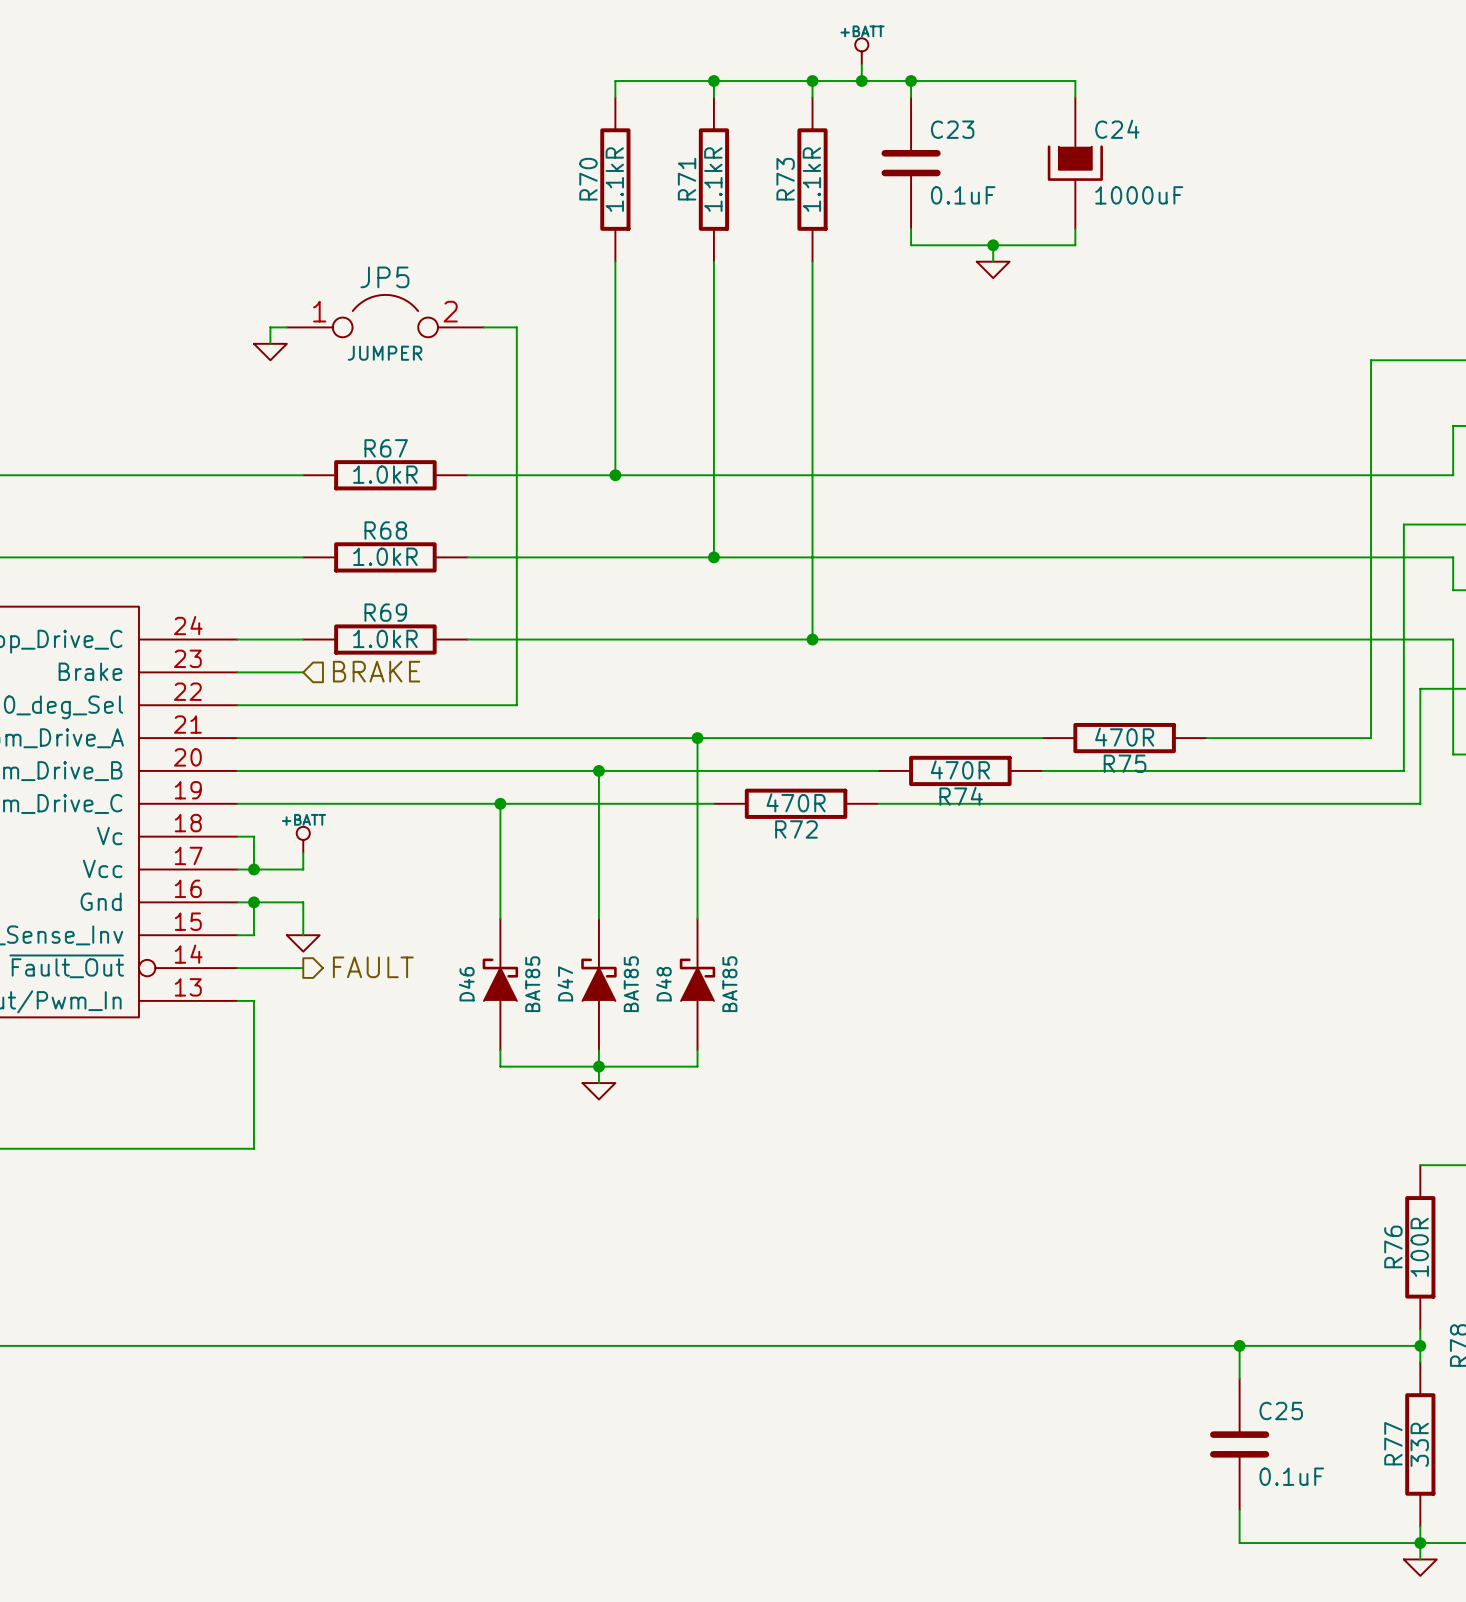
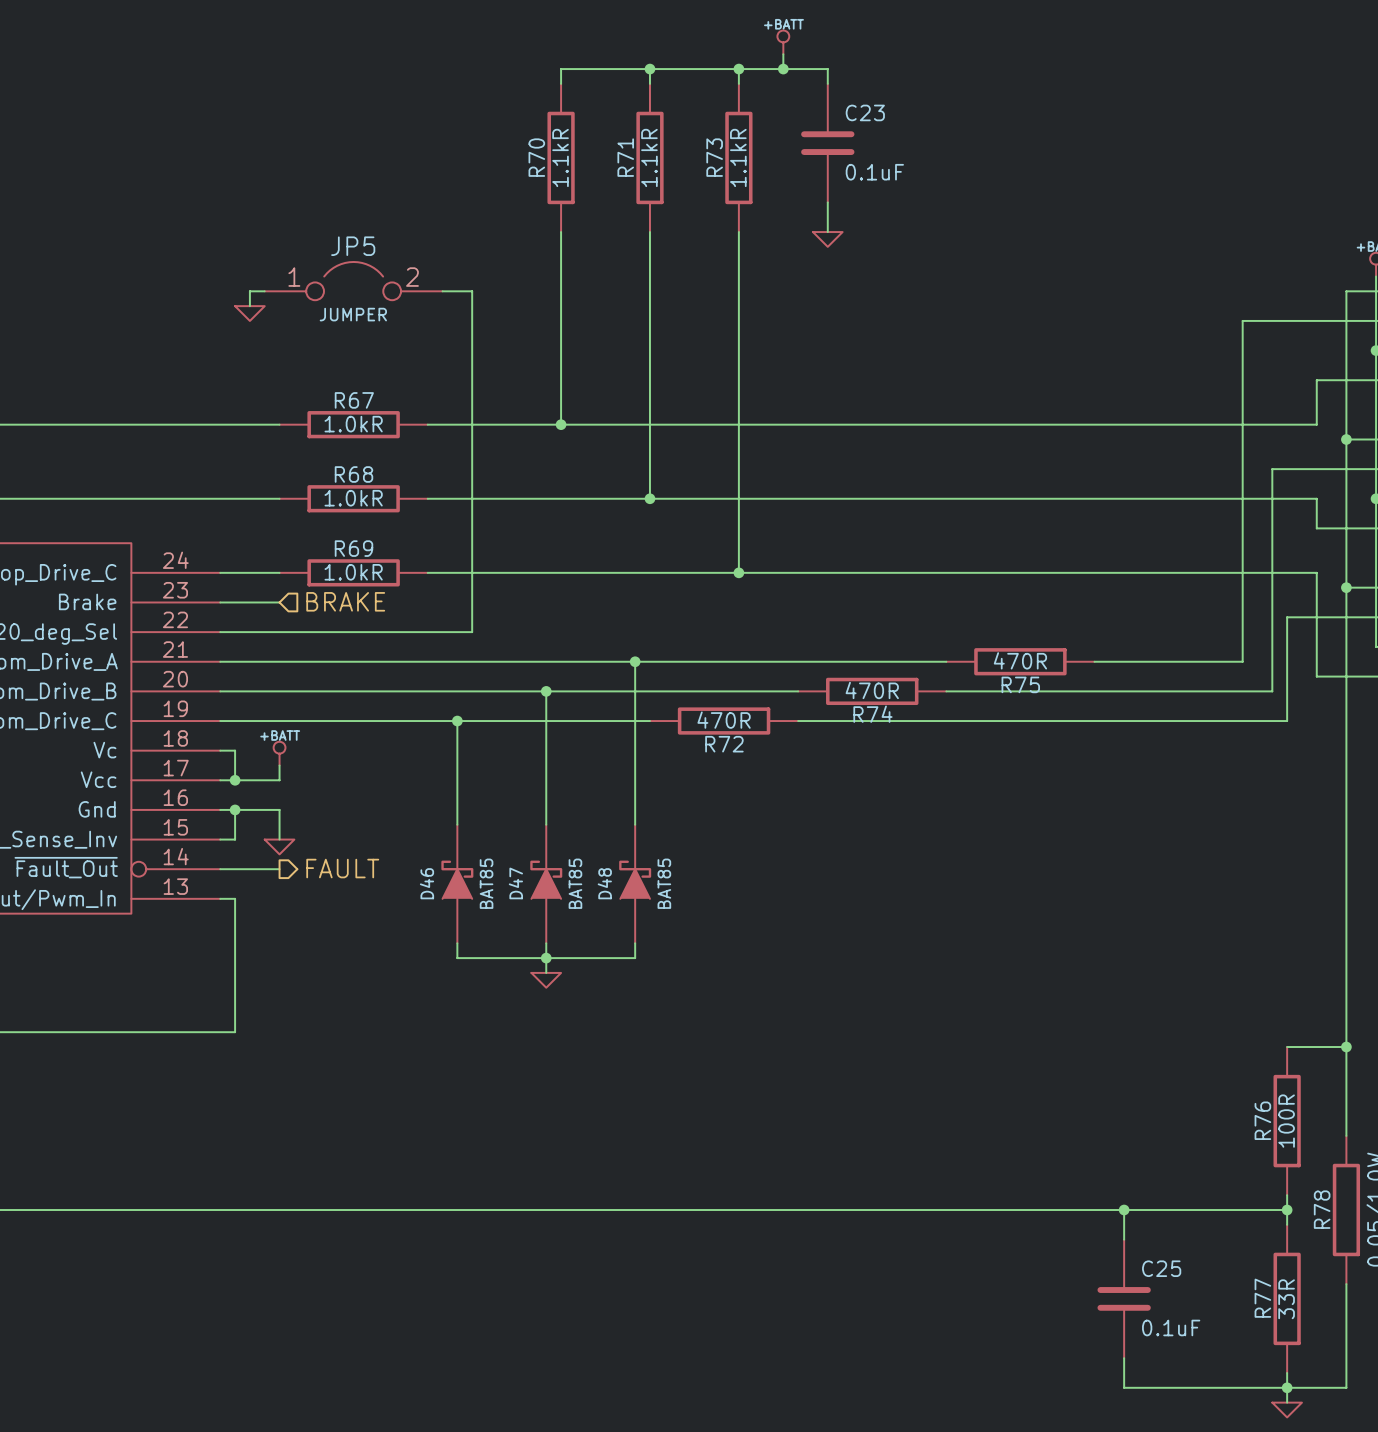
wire: (911, 81) (1075, 81) (1075, 97) -> none
junction: (911, 81) -> none
C24: 1000uF (1075, 163) -> none
wire: (1075, 228) (1075, 245) (911, 245) -> (827, 232) (827, 217)
wire: (993, 245) (993, 261) -> none
junction: (993, 245) -> none
power symbol position: (993, 269) -> (827, 239)

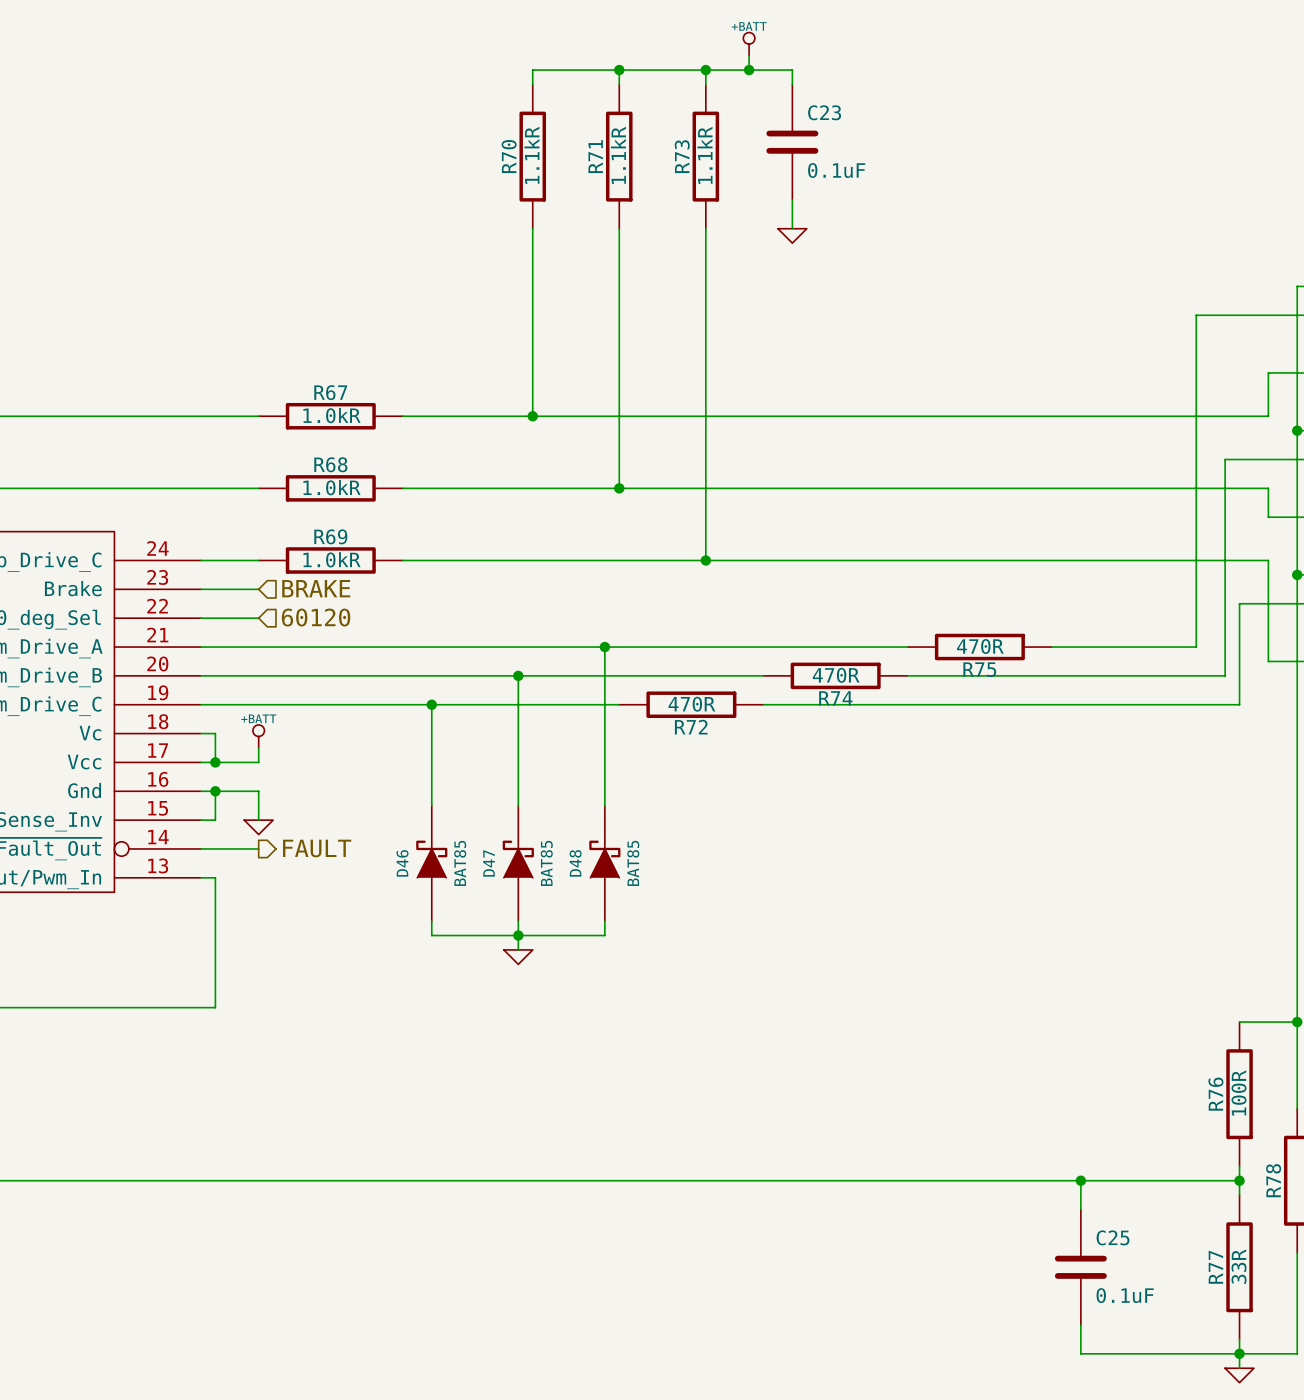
JP5: JUMPER (353, 281) -> none
wire: (264, 291) (249, 291) (249, 306) -> none
wire: (442, 291) (472, 291) (472, 632) (279, 632) -> none
power symbol: (249, 313) -> none
hierarchical label: none -> 60120 (316, 617)

